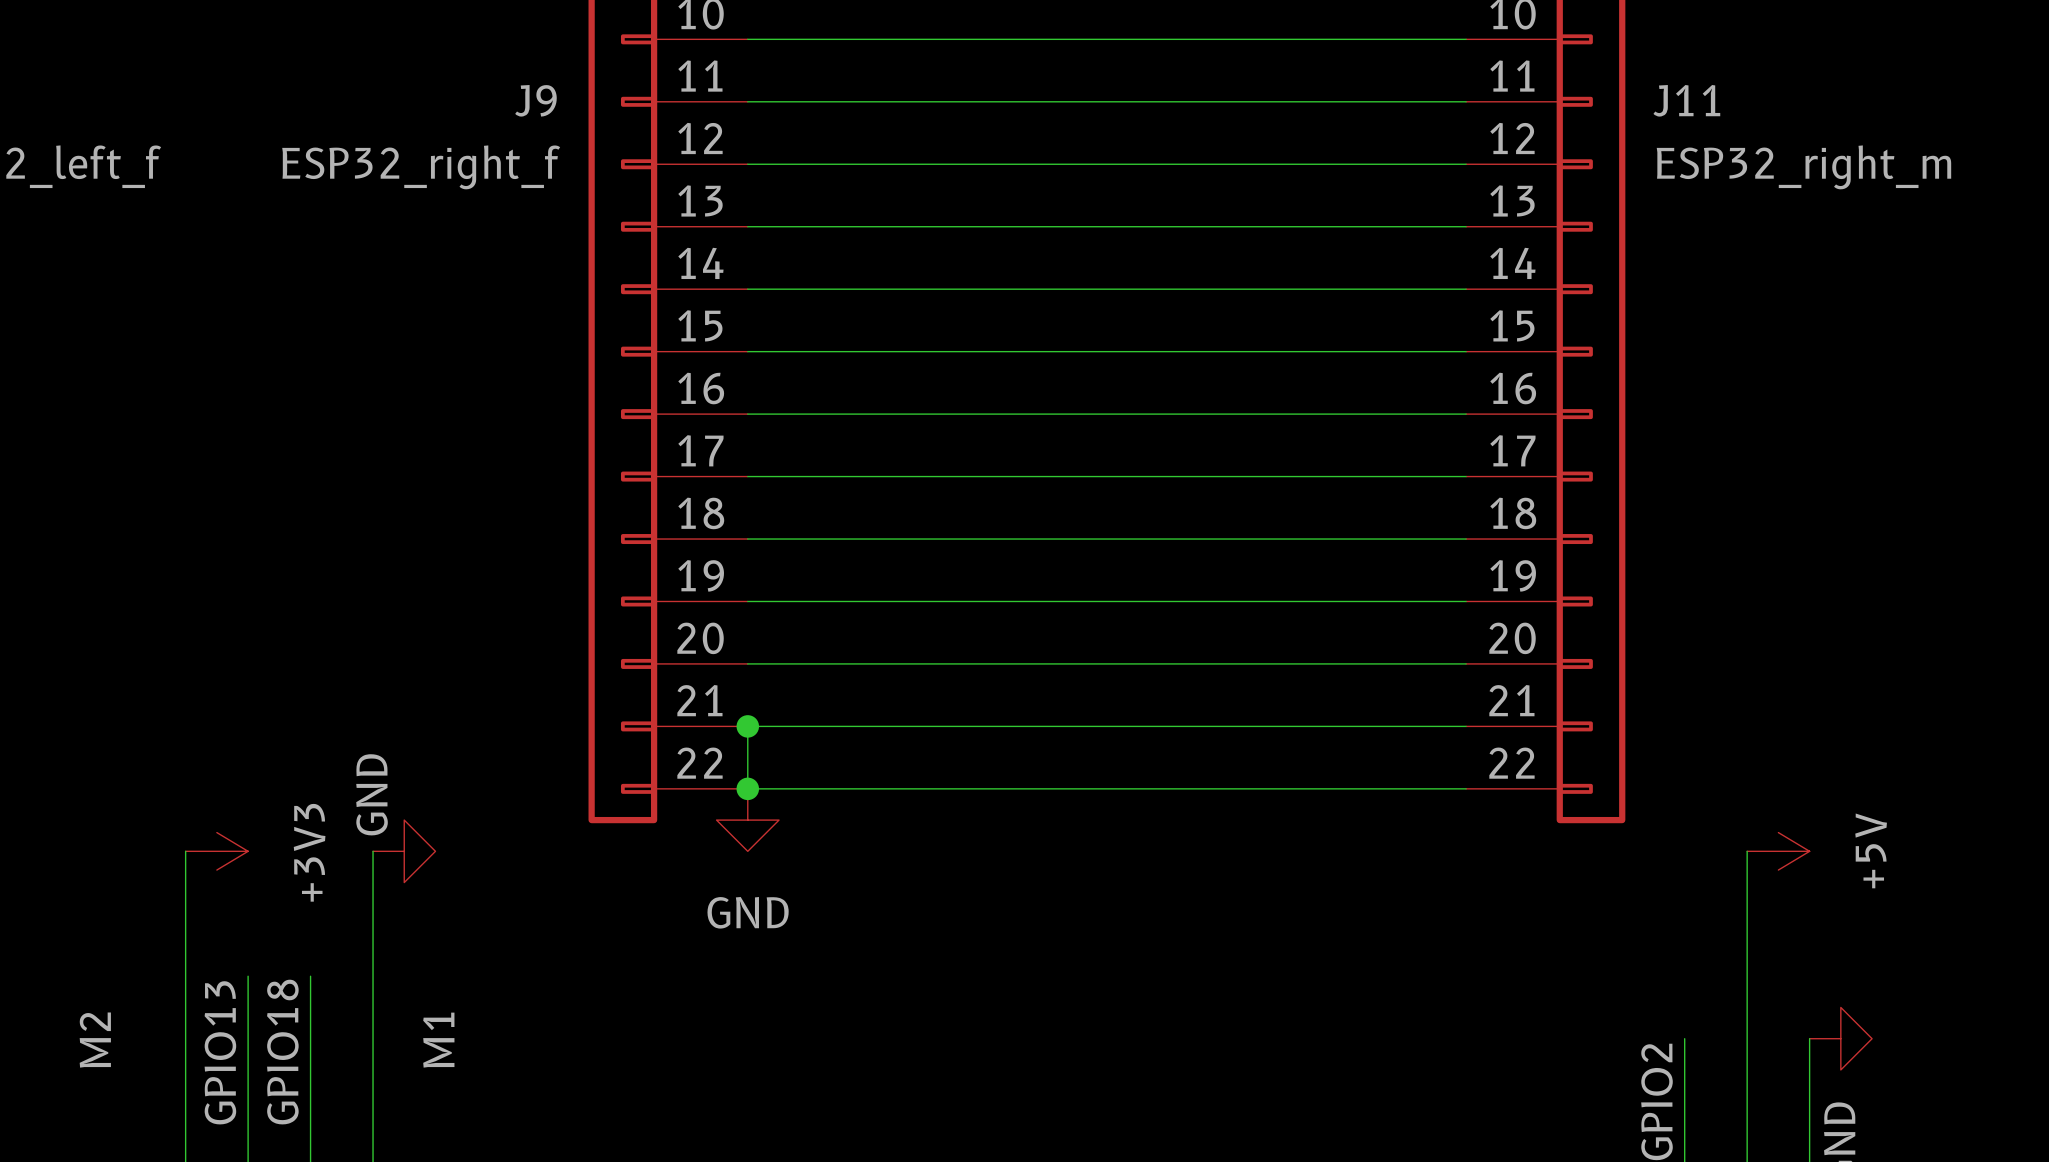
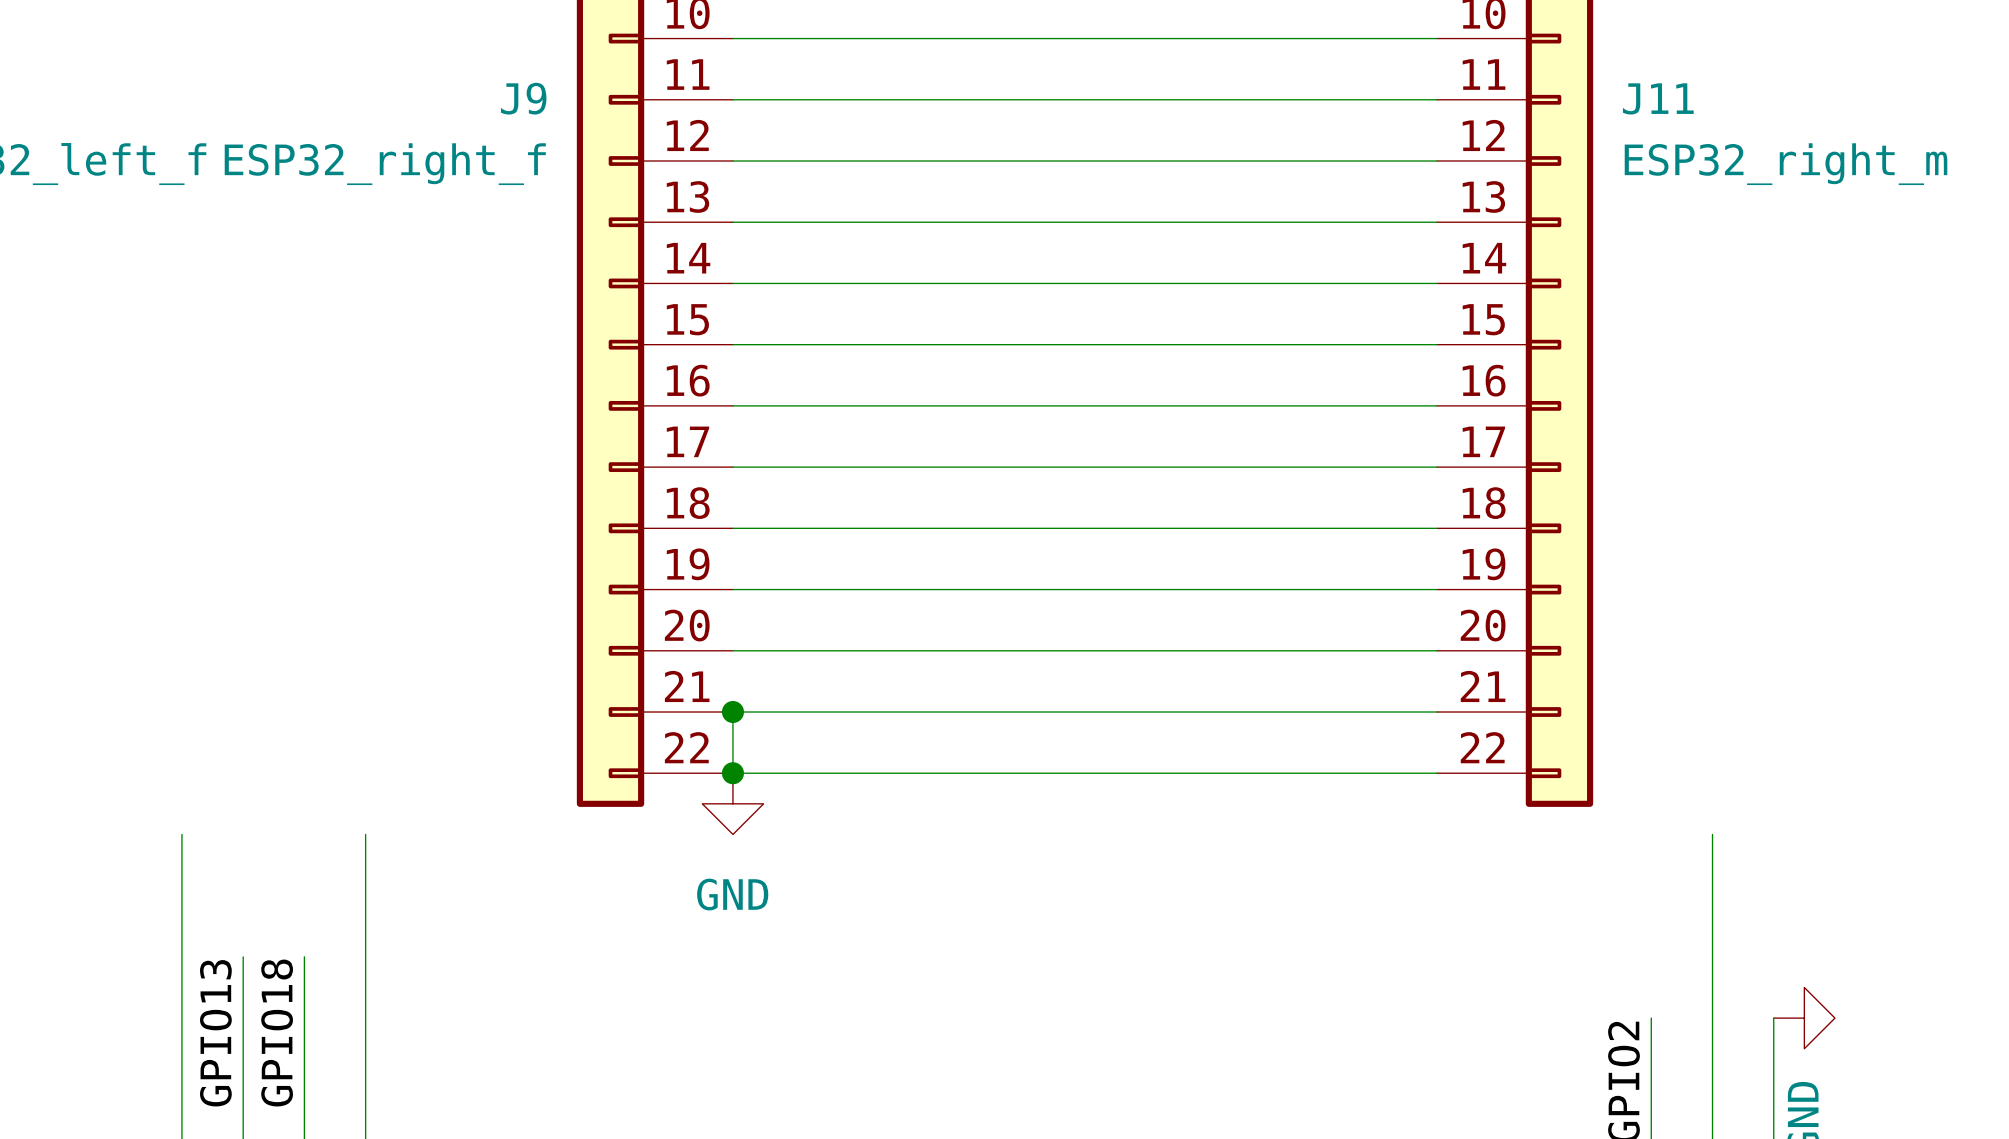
power symbol: +3V3 (216, 851) -> none
power symbol: GND (404, 851) -> none
power symbol: +5V (1778, 851) -> none
label: M2 (95, 1040) -> none
label: M1 (438, 1040) -> none

